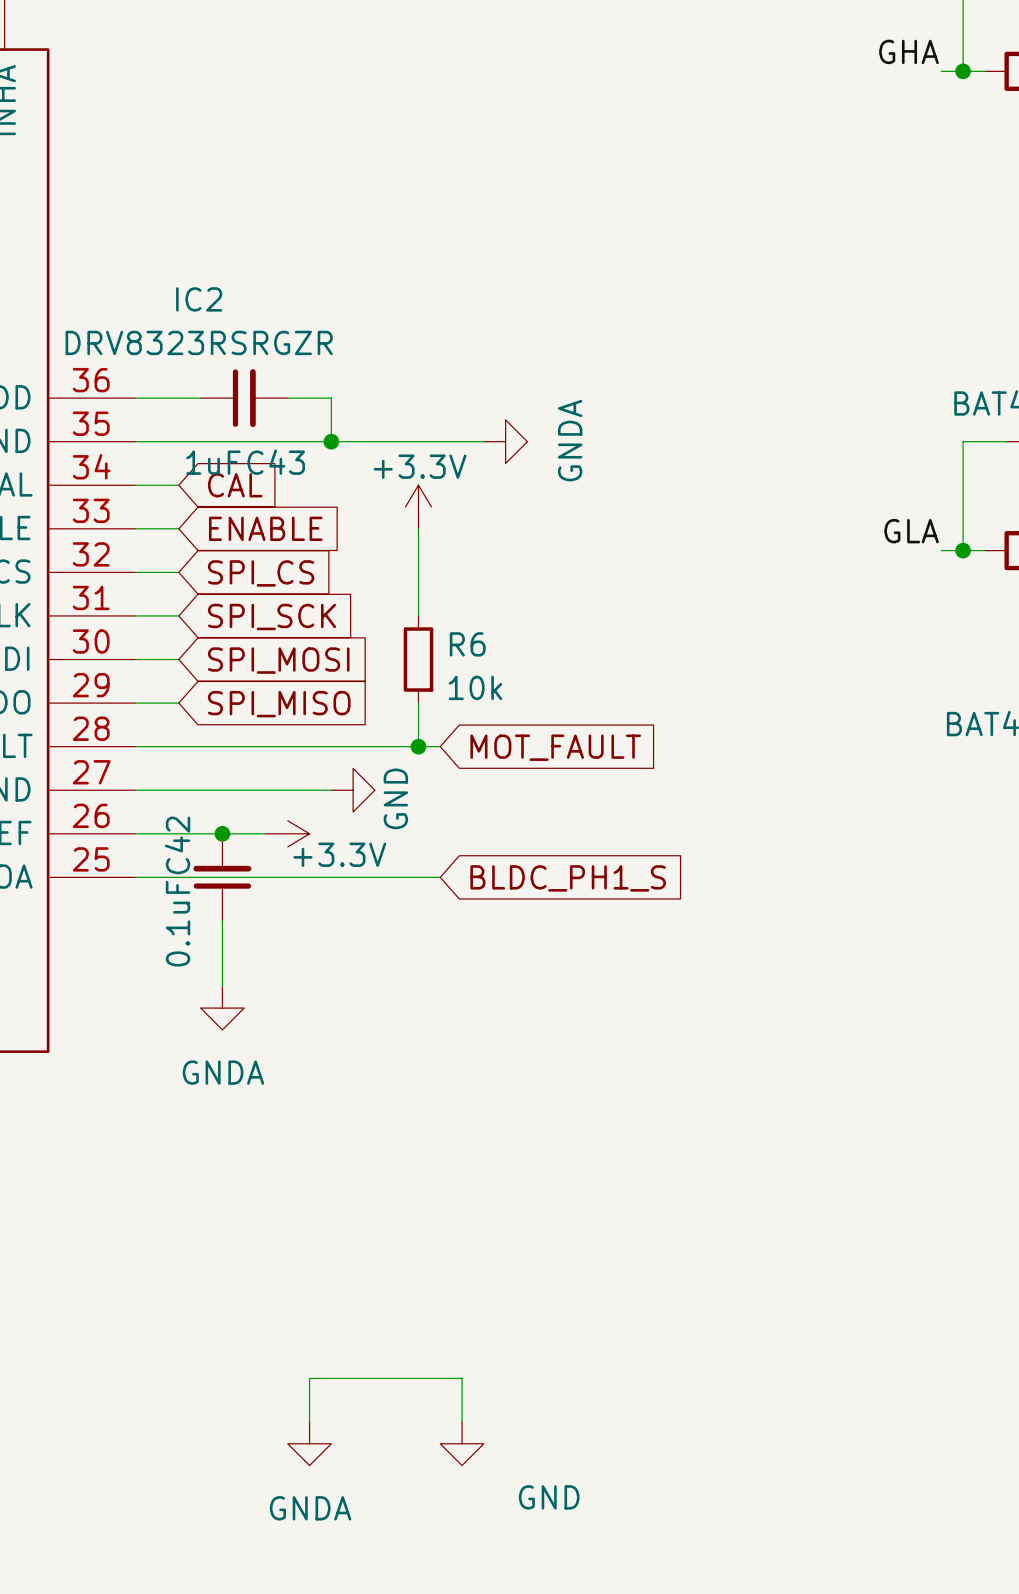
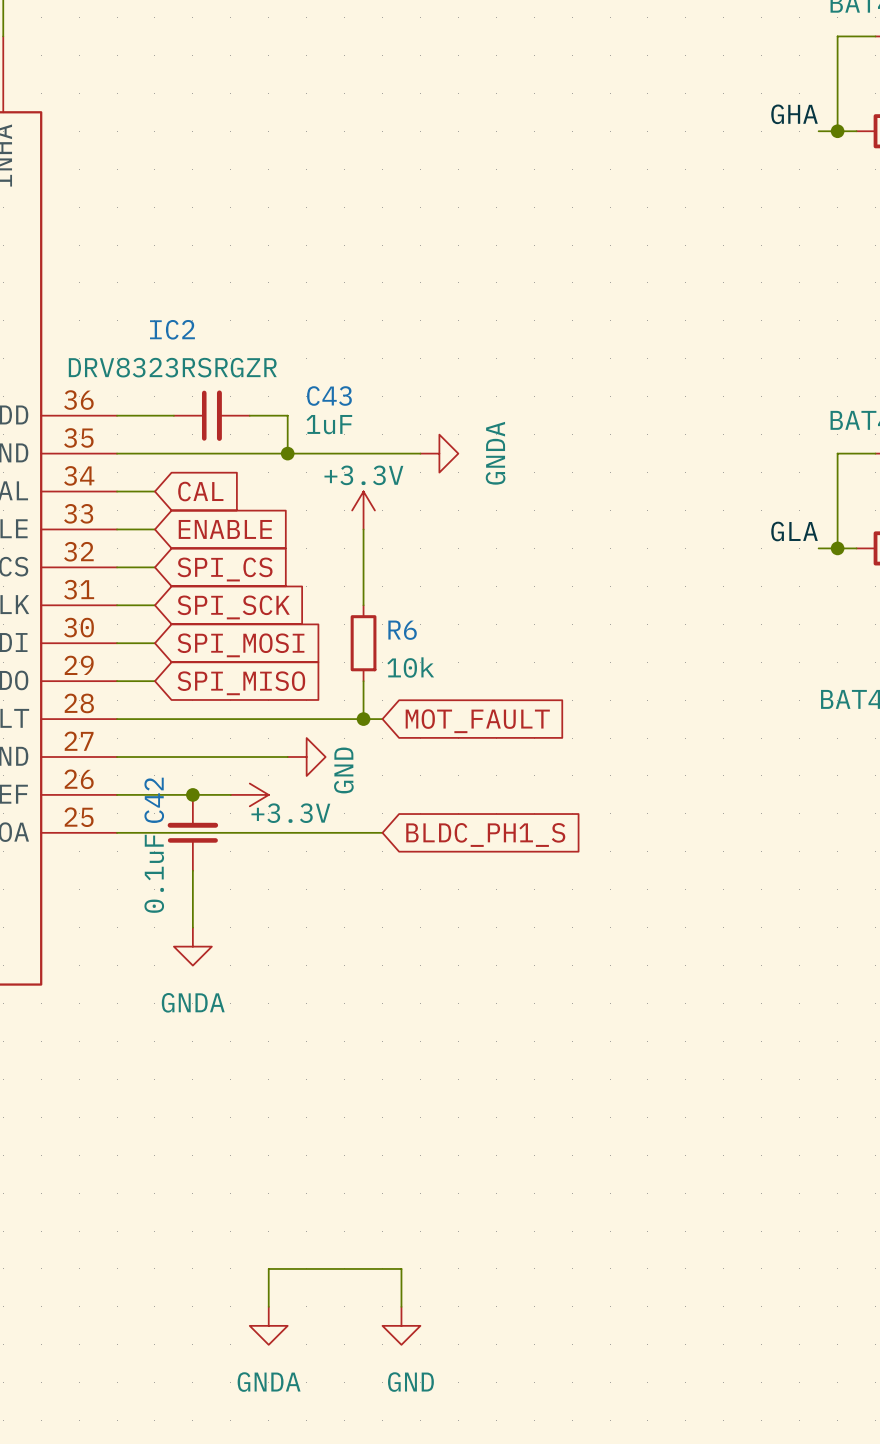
C43 value position: 1uF (213, 462) -> 1uF (329, 424)
C43 name position: C43 (276, 462) -> C43 (329, 396)
power symbol text position: GND (549, 1497) -> GND (410, 1382)

